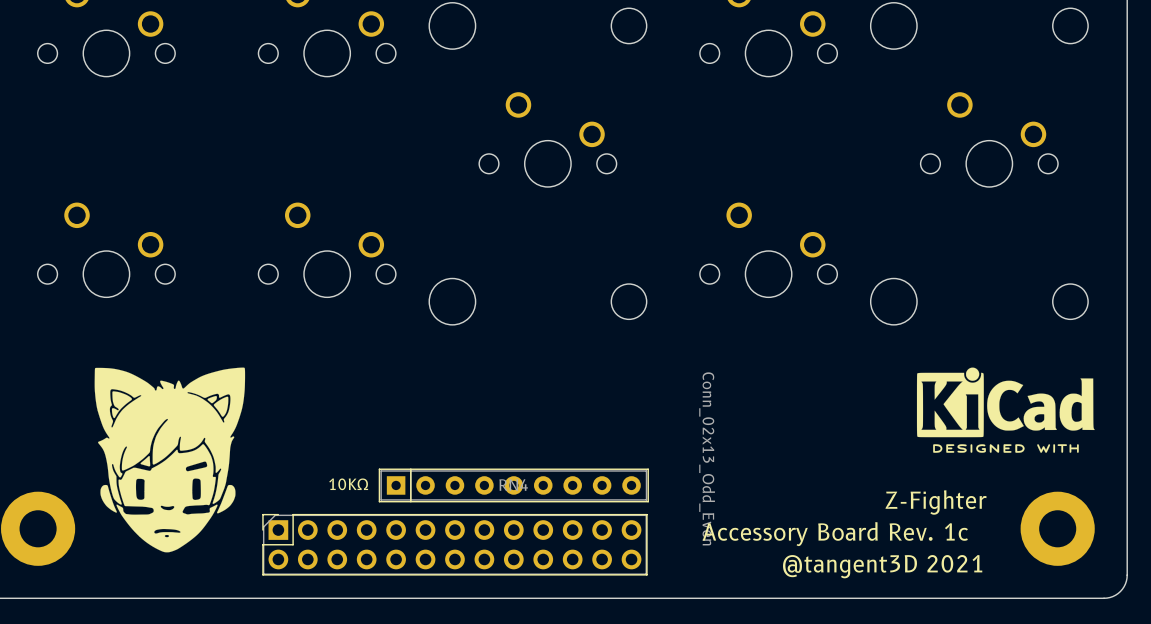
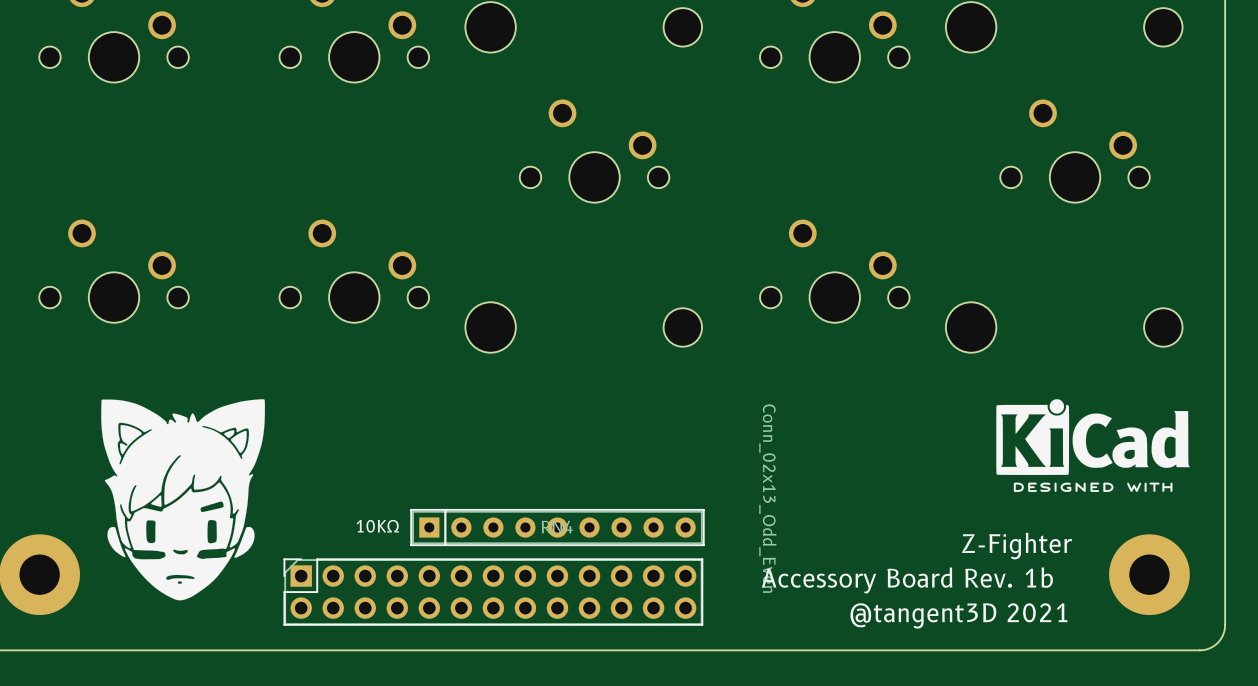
text: Accessory Board Rev. 1c (835, 534) -> Accessory Board Rev. 1b (907, 580)

